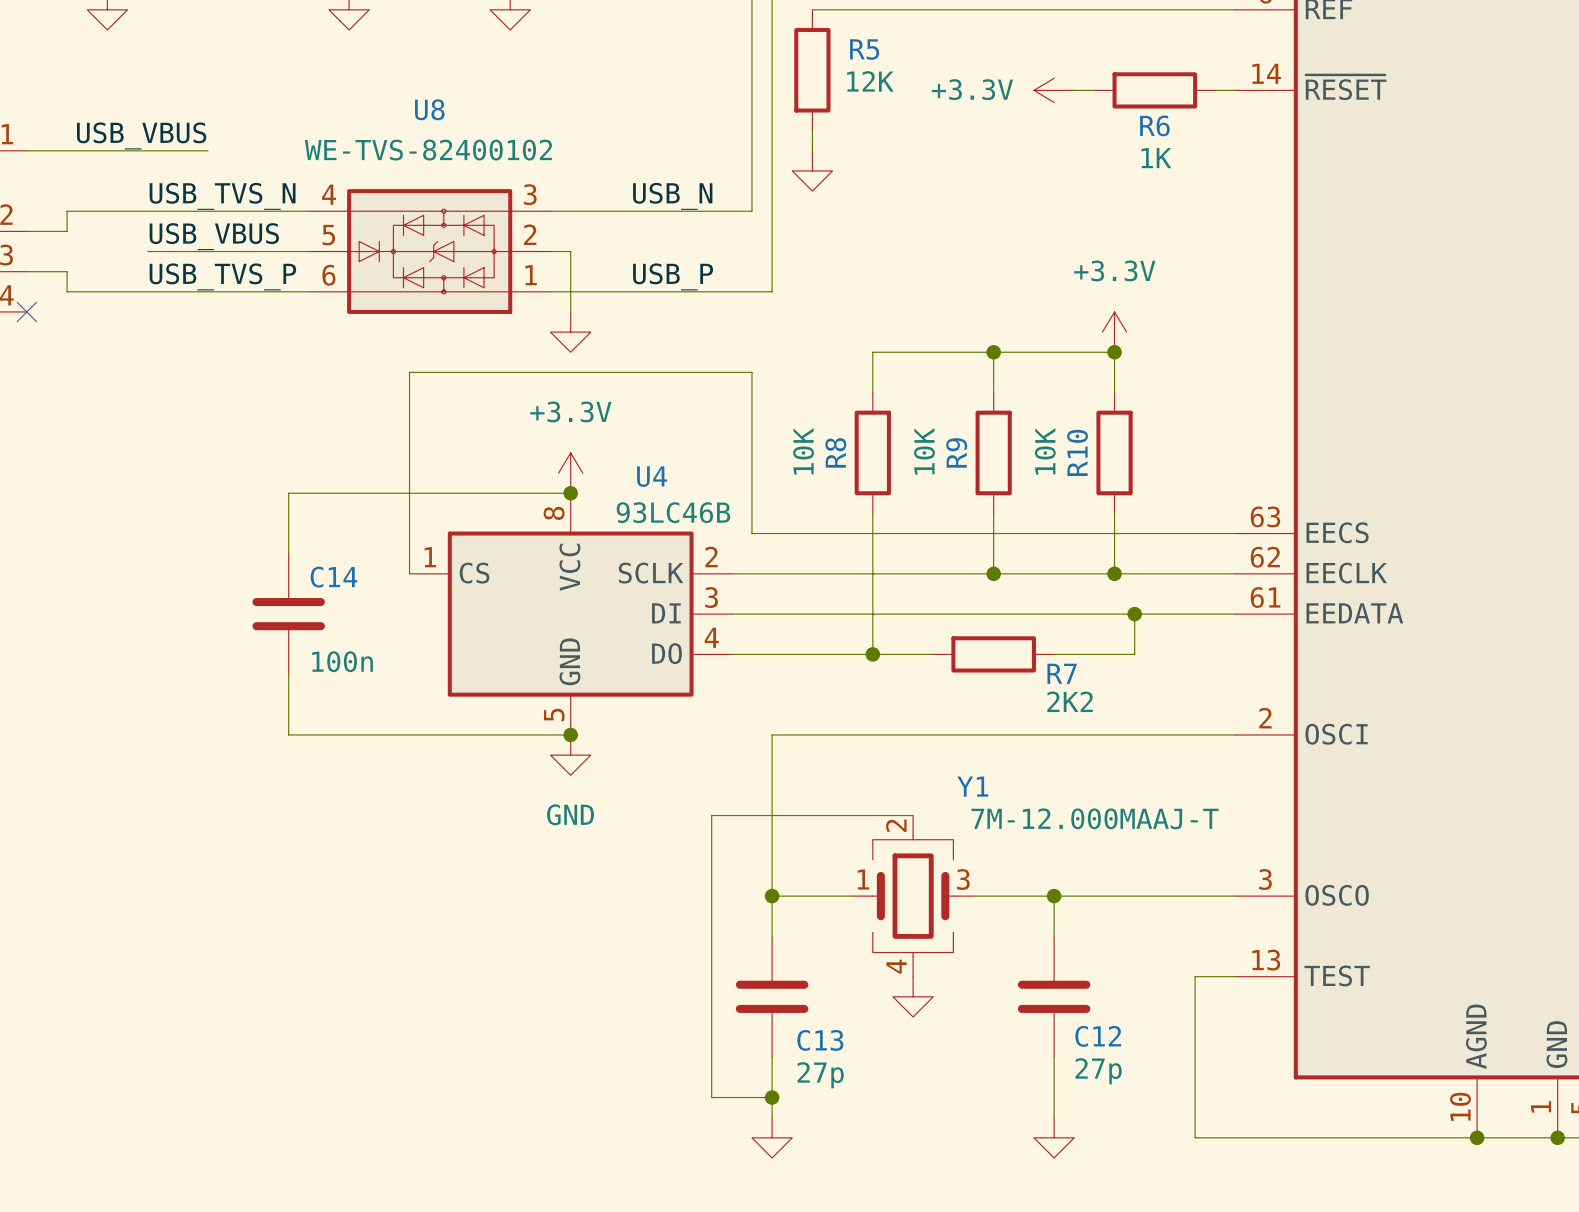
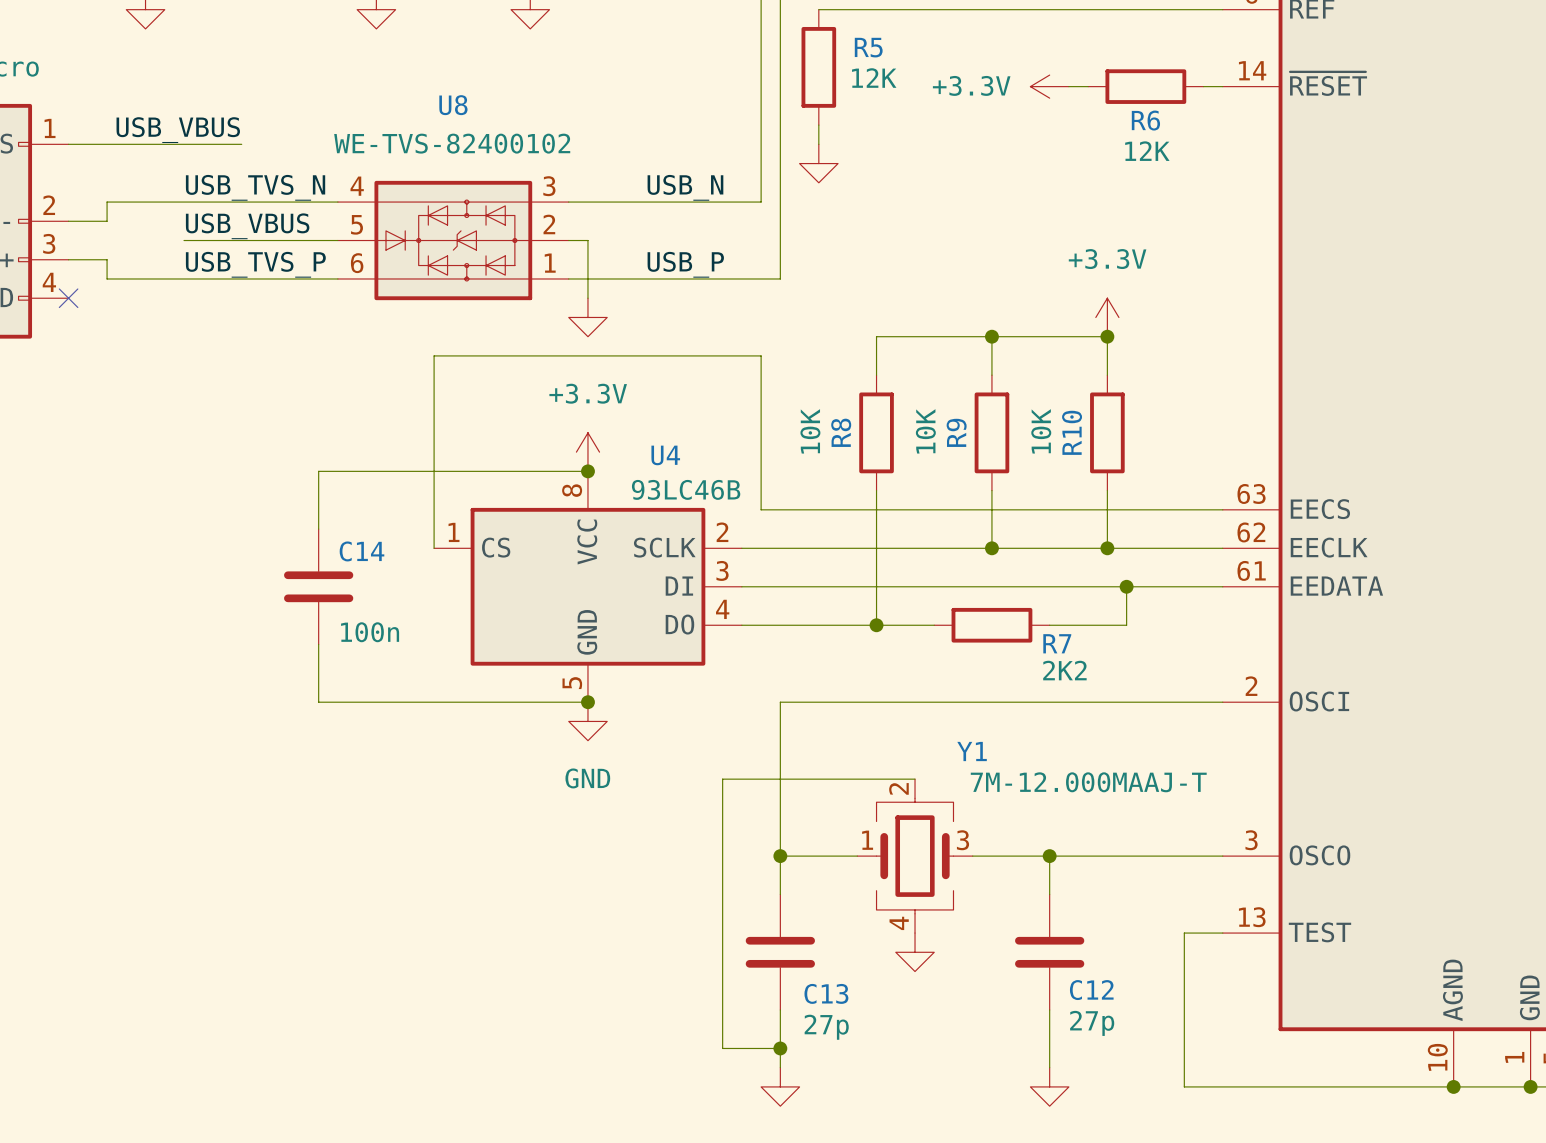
R6 value: 1K (1156, 158) -> 12K (1147, 151)

